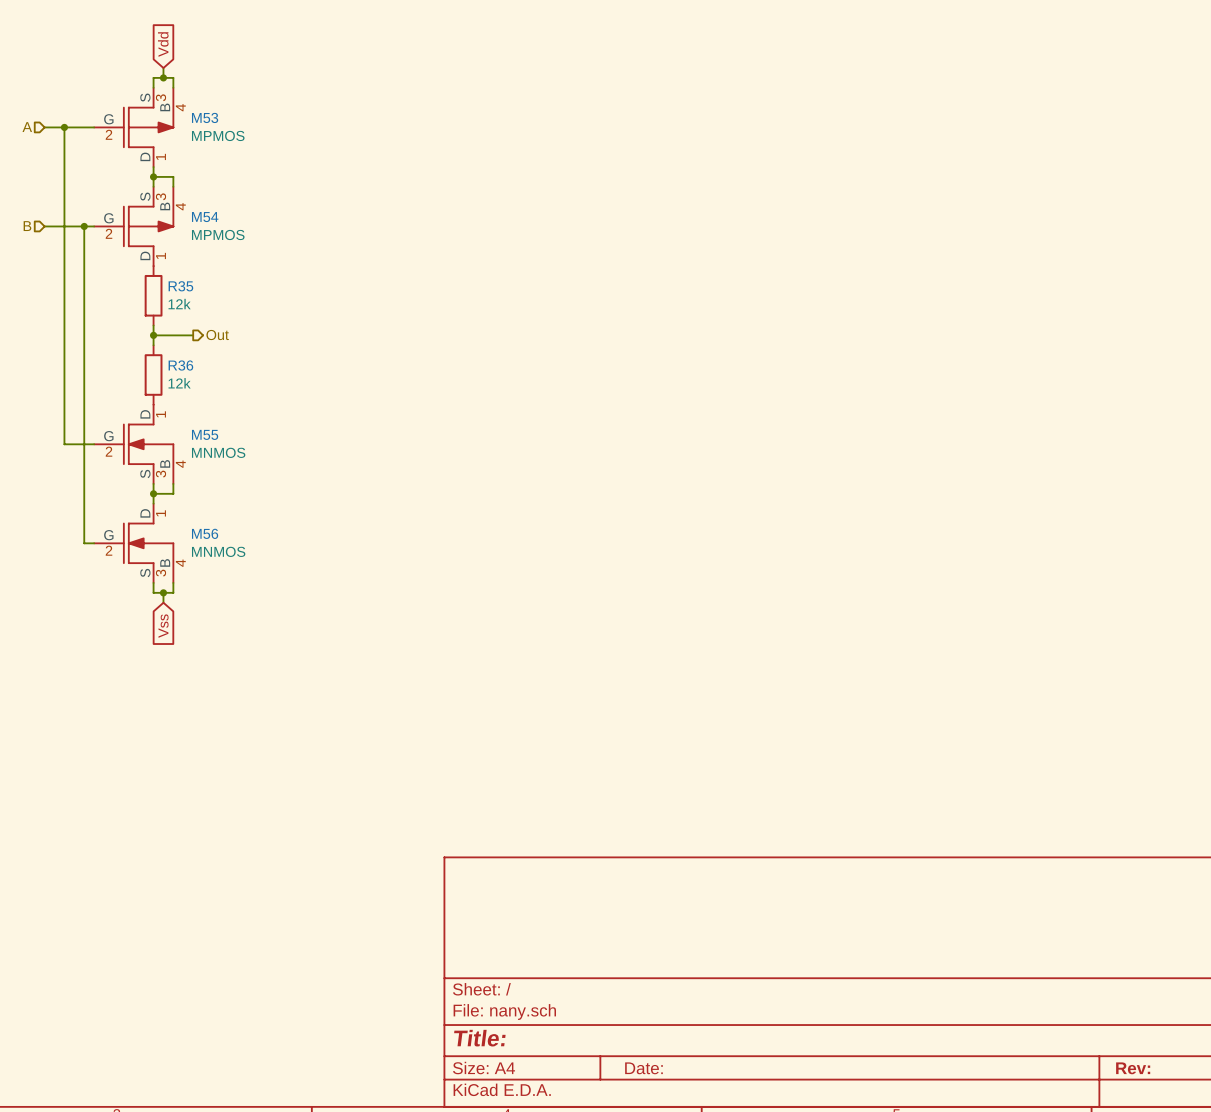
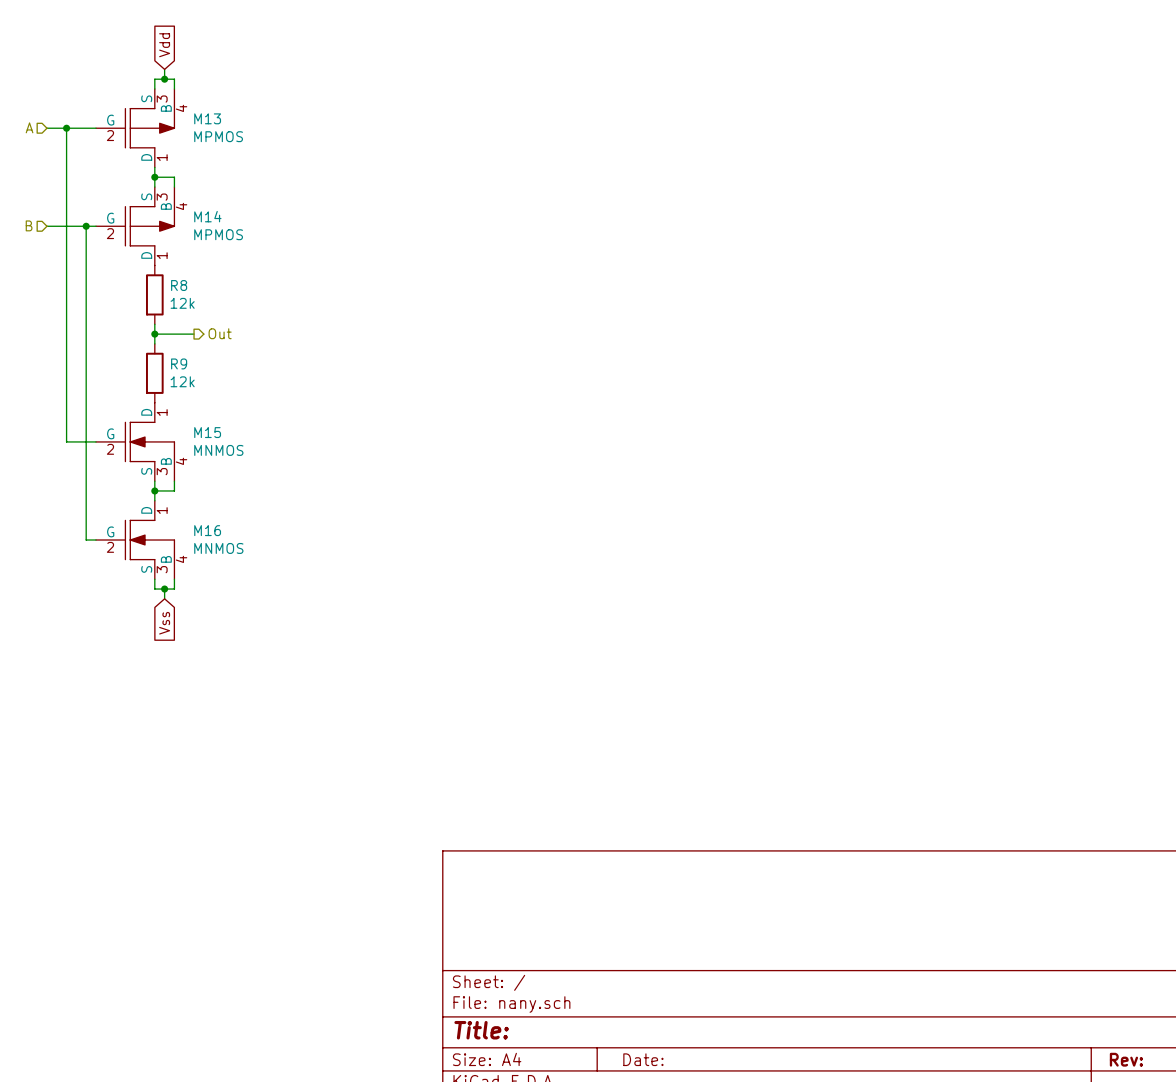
M53 name: M53 (205, 117) -> M13 (207, 118)
M54 name: M54 (205, 217) -> M14 (207, 216)
R35 name: R35 (180, 286) -> R8 (179, 285)
R36 name: R36 (180, 365) -> R9 (179, 363)
M55 name: M55 (205, 434) -> M15 (207, 432)
M56 name: M56 (205, 533) -> M16 (207, 530)

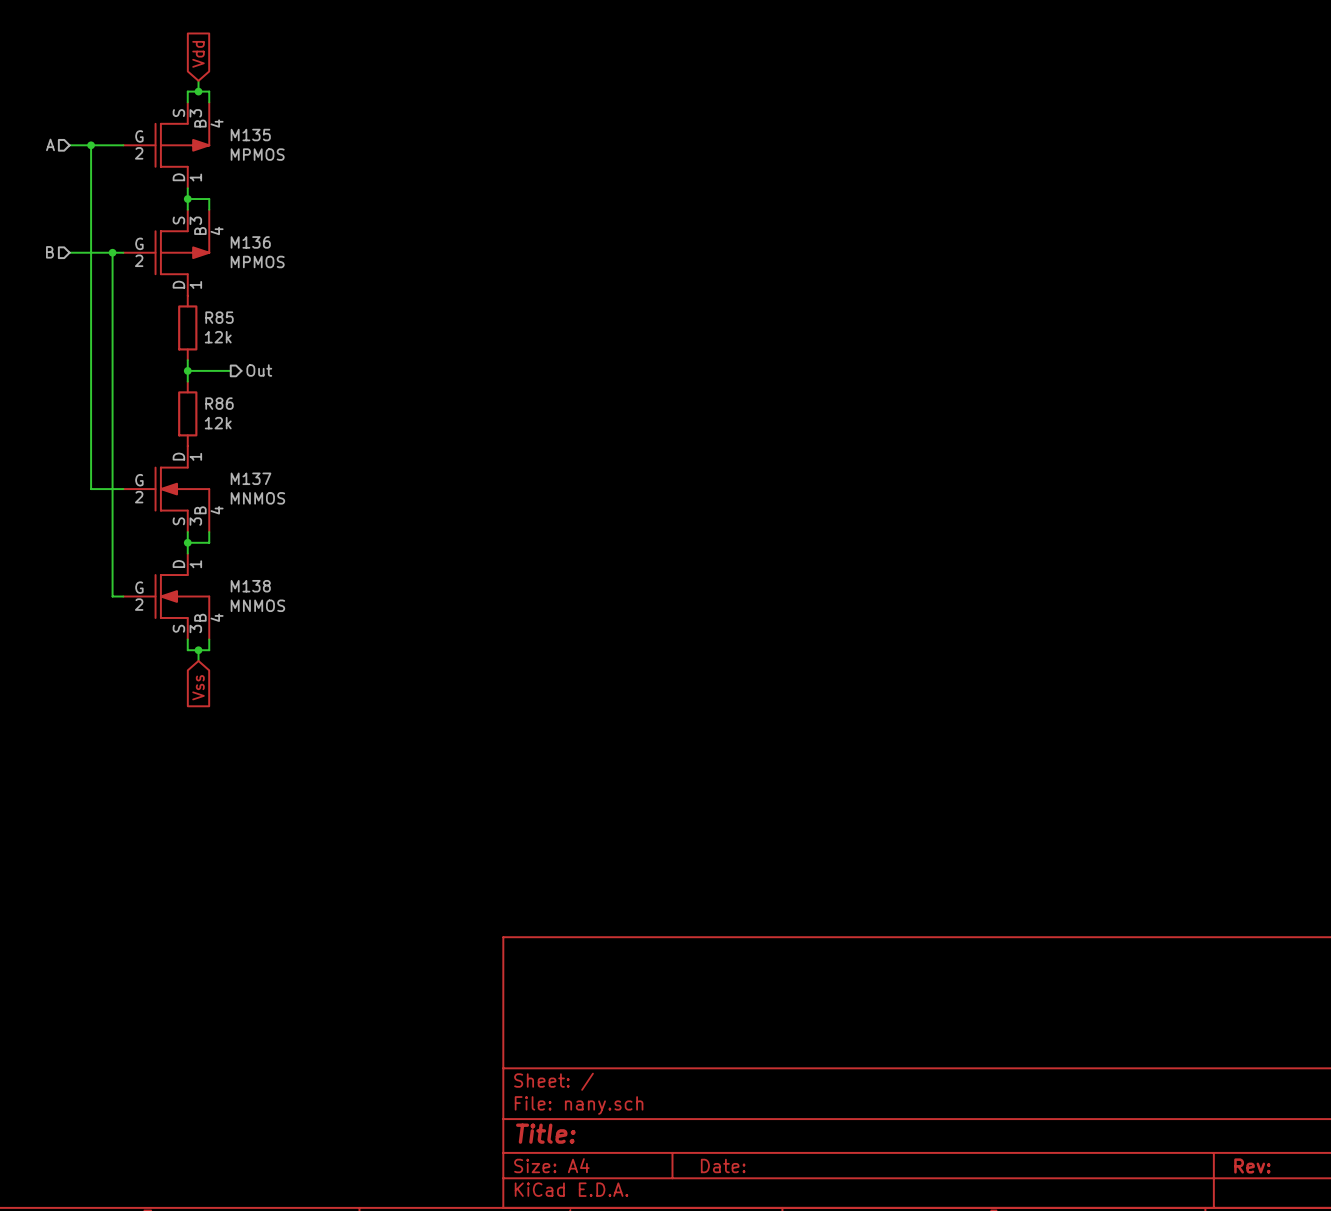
M13 name: M13 (207, 118) -> M135 (250, 135)
M14 name: M14 (207, 216) -> M136 (250, 242)
R8 name: R8 (179, 285) -> R85 (219, 317)
R9 name: R9 (179, 363) -> R86 (219, 403)
M15 name: M15 (207, 432) -> M137 (251, 478)
M16 name: M16 (207, 530) -> M138 (250, 586)

